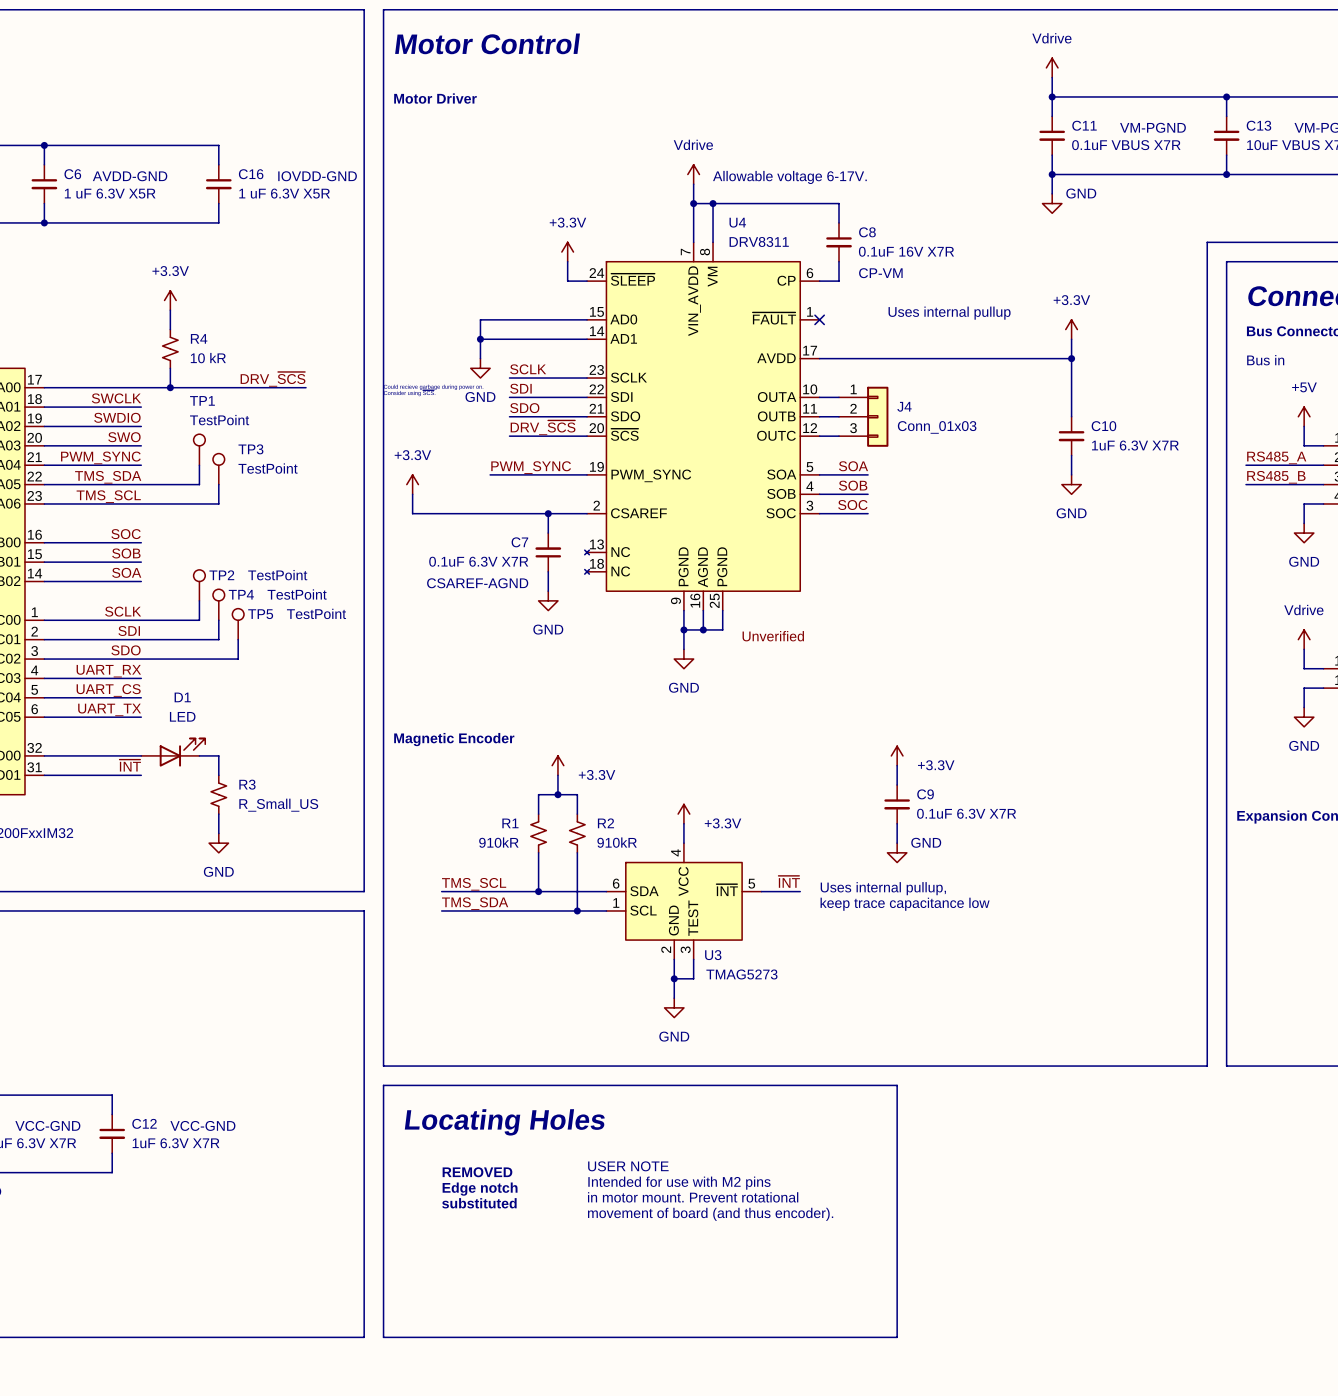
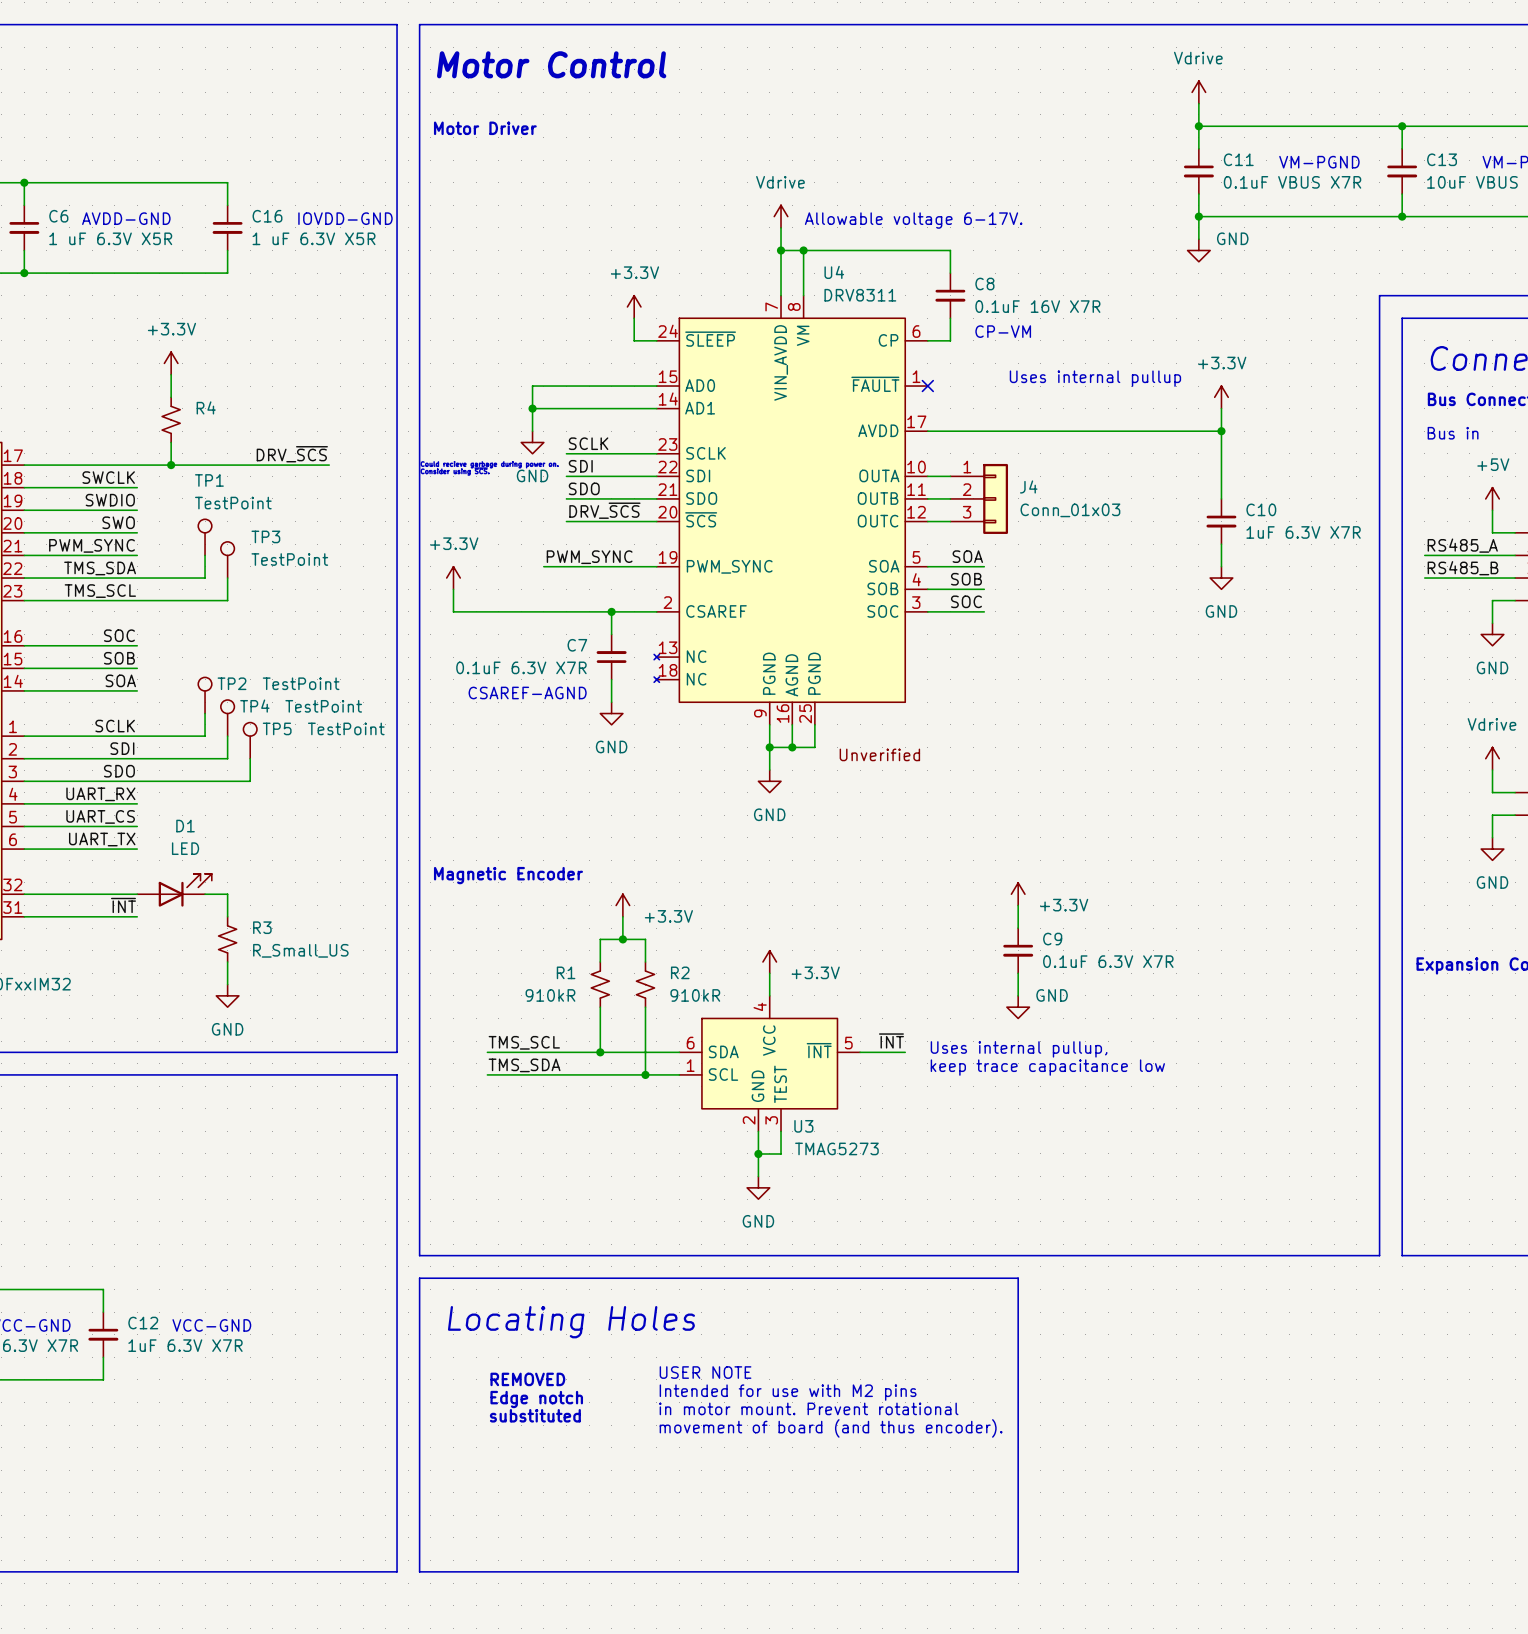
R4 value: 10 kR (208, 358) -> none

